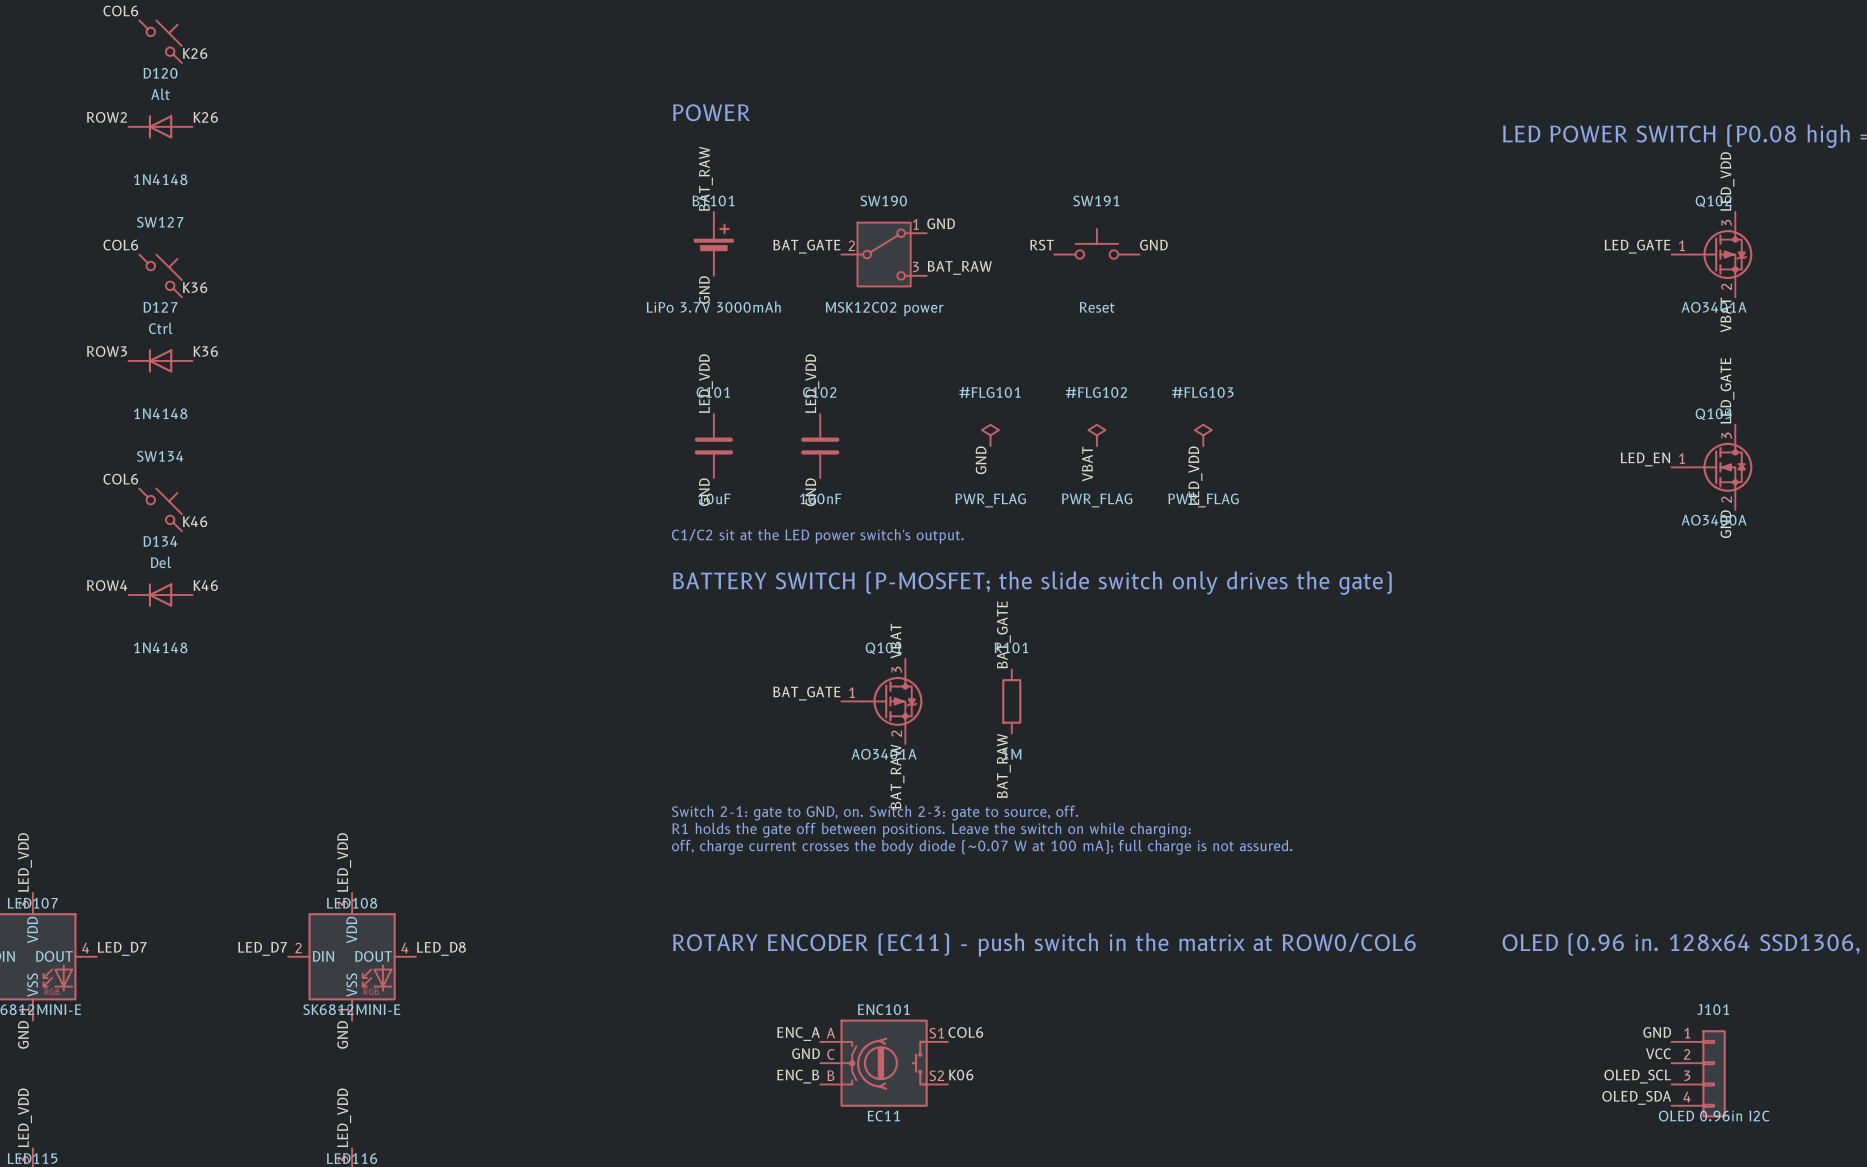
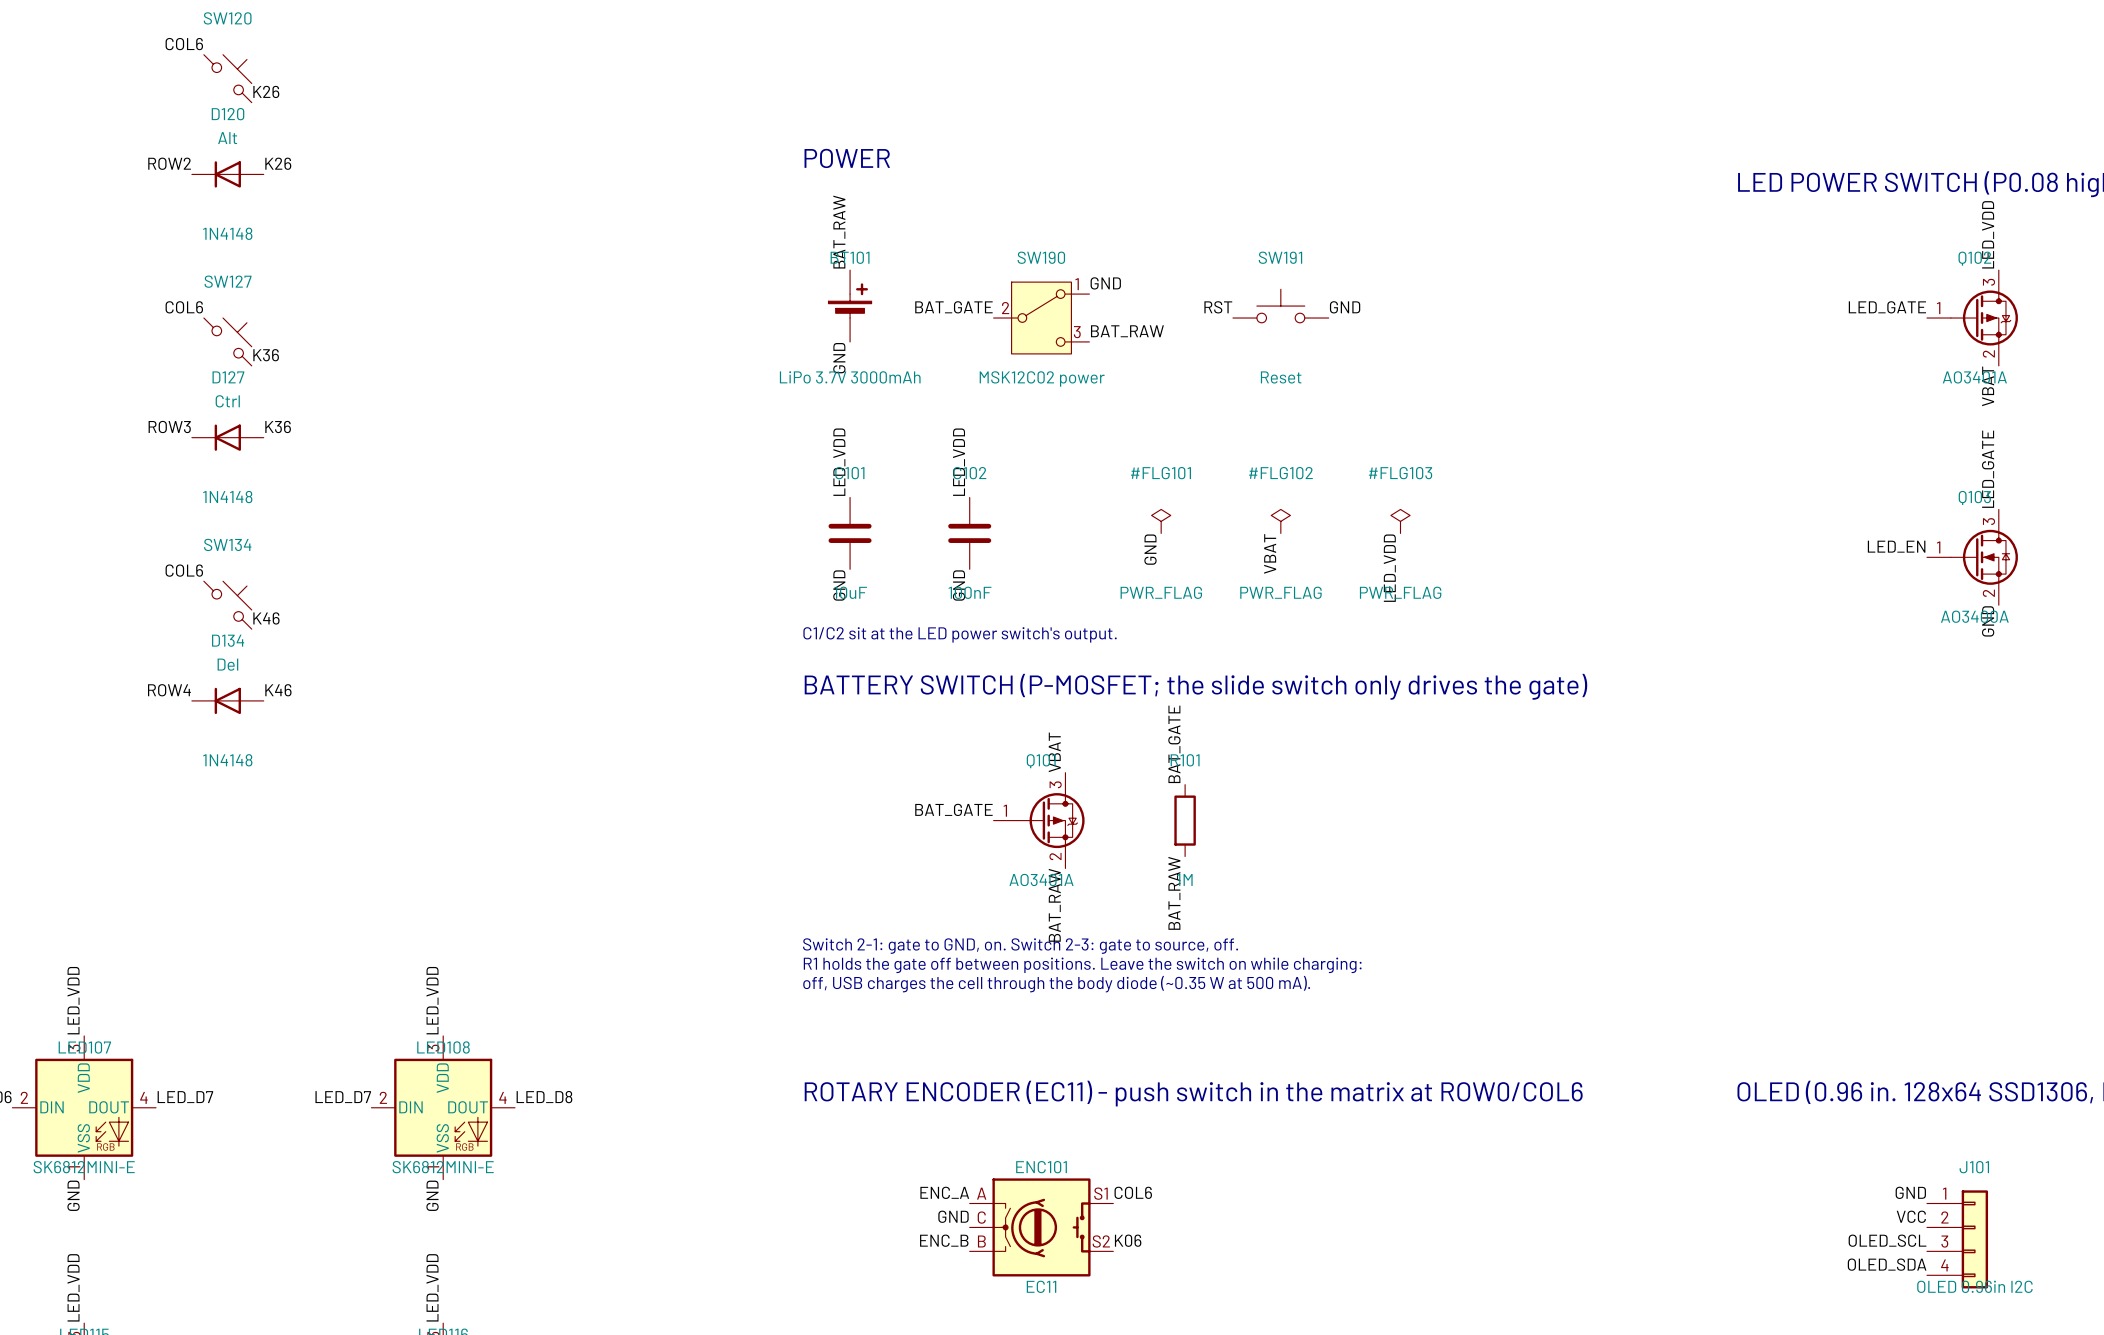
text: off, charge current crosses the body diode (~0.07 W at 100 mA); full charge is not assured. (982, 847) -> off, USB charges the cell through the body diode (~0.35 W at 500 mA). (1056, 984)

